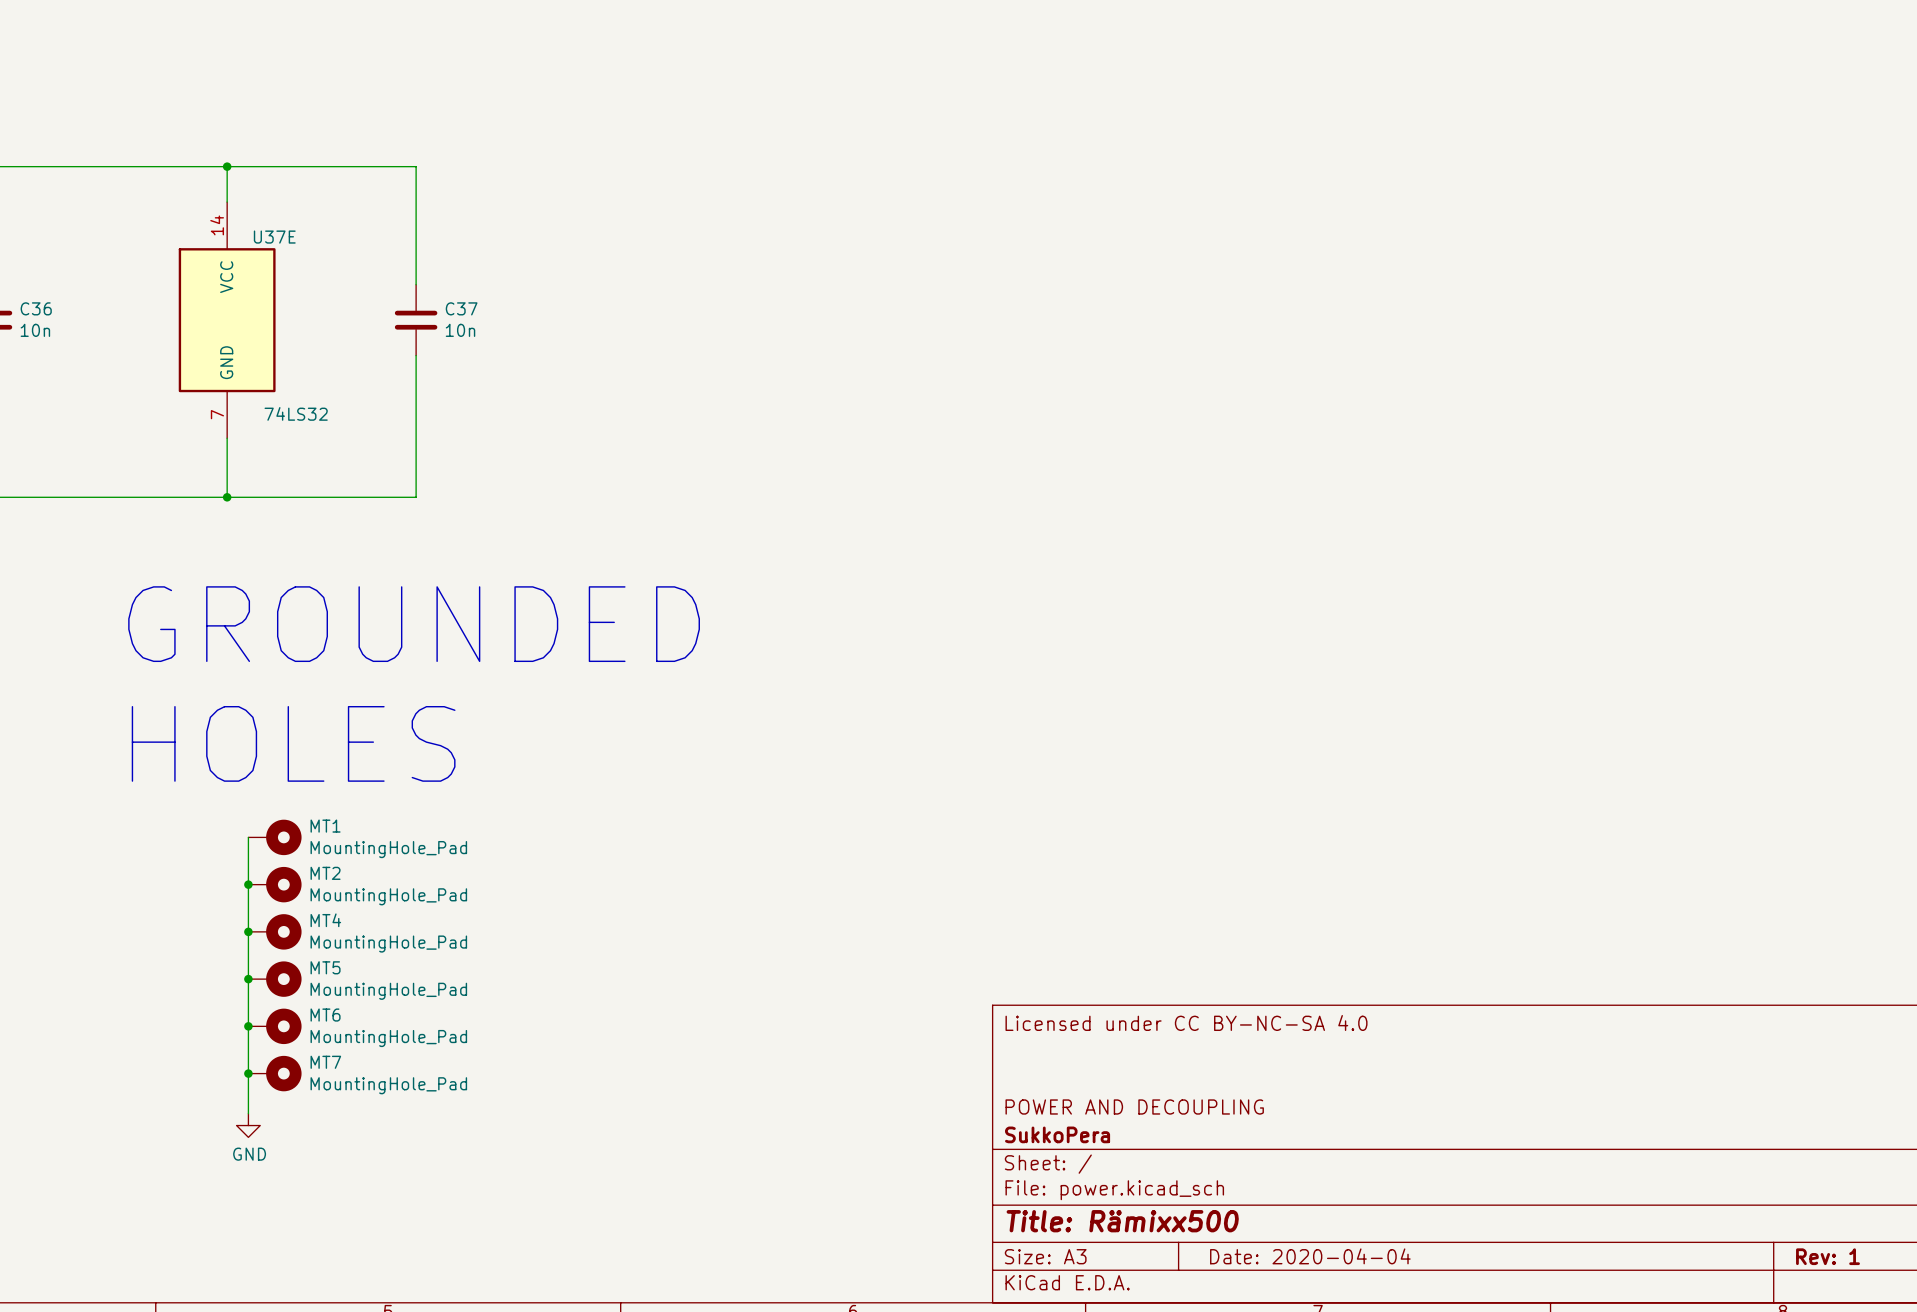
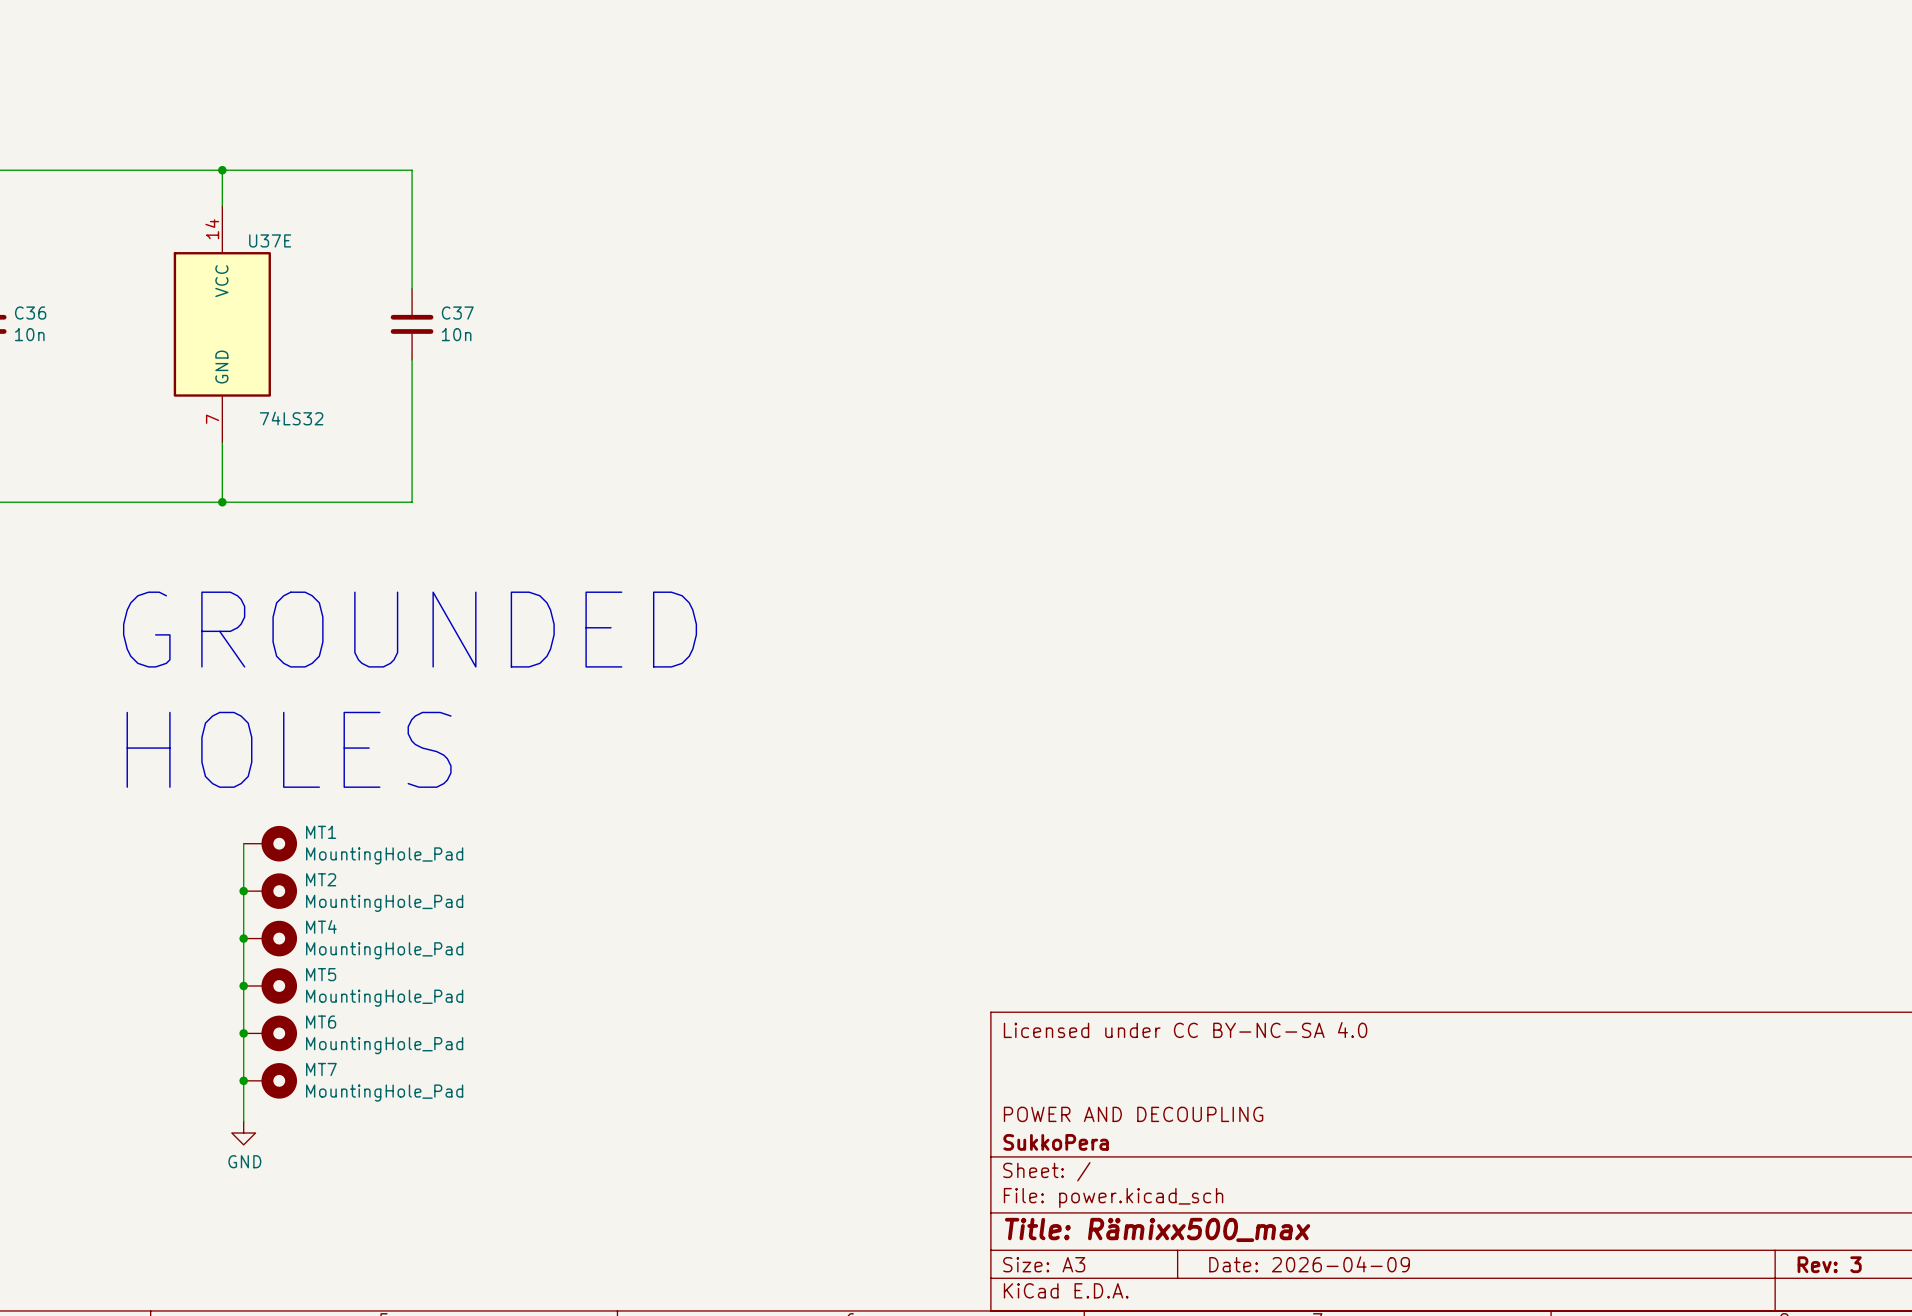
title block: Title: Rämixx500 (1122, 1221) -> Title: Rämixx500_max (1157, 1229)
title block: Date: 2020-04-04 (1310, 1256) -> Date: 2026-04-09 (1309, 1264)
title block: Rev: 1 (1828, 1256) -> Rev: 3 (1829, 1264)

